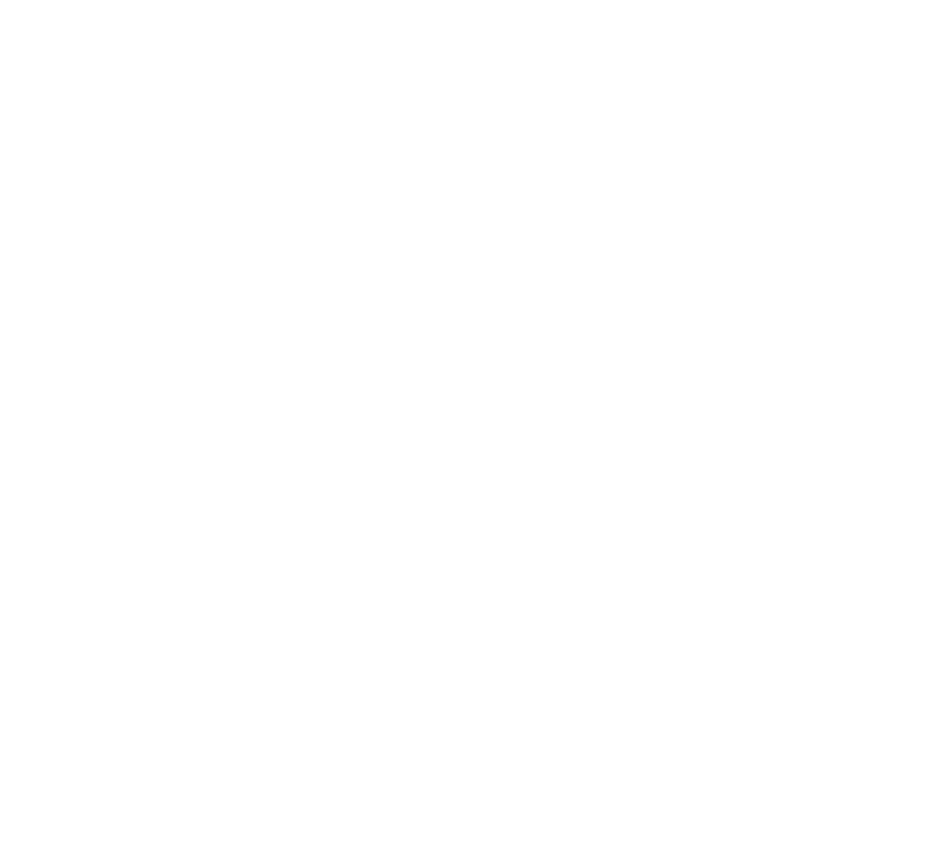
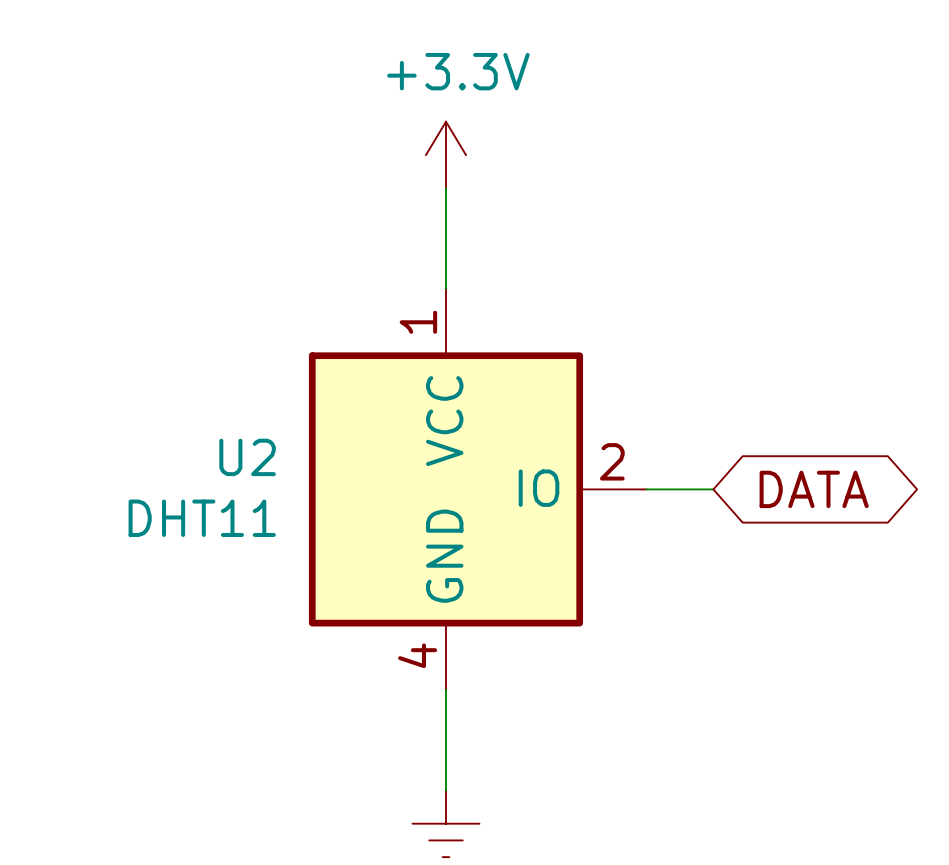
power symbol: none -> +3.3V (445, 155)
wire: none -> (445, 188) (445, 288)
U2: none -> DHT11 (477, 489)
wire: none -> (646, 489) (713, 489)
global label: none -> DATA (814, 489)
wire: none -> (445, 689) (445, 790)
power symbol: none -> (445, 823)

